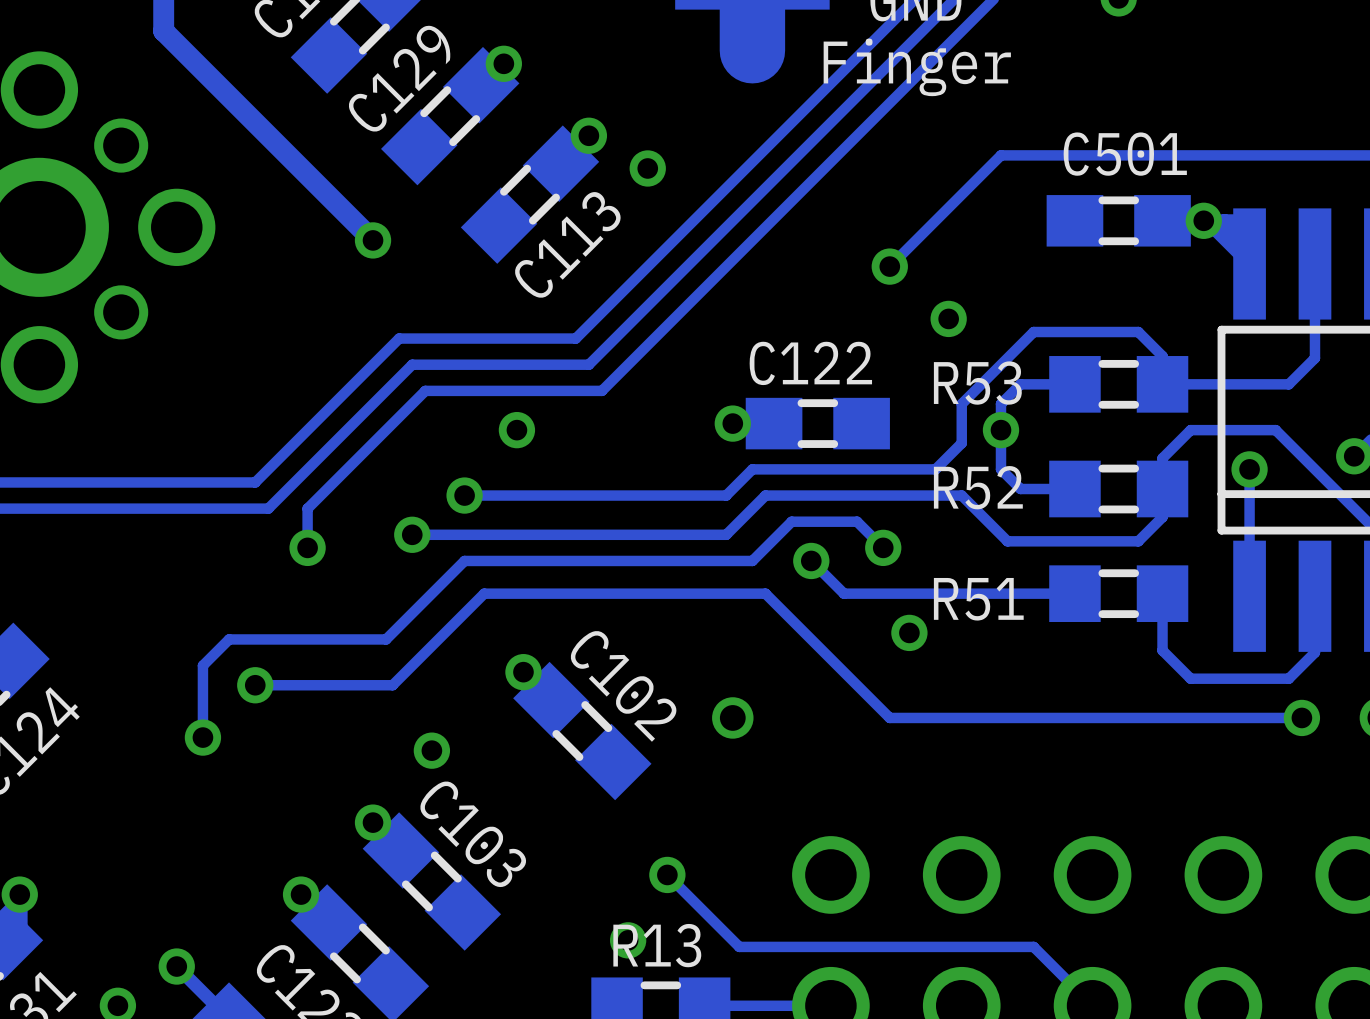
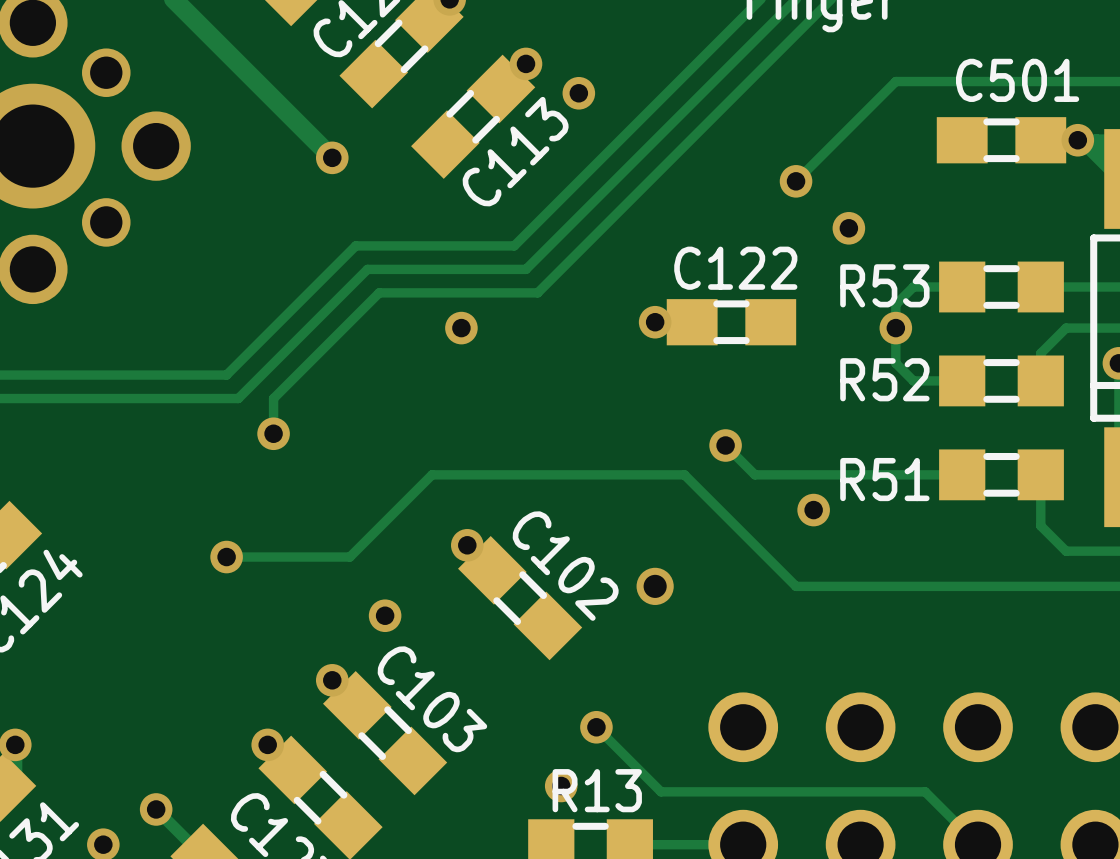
track: (1162, 384) (1162, 356) (1138, 332) (1033, 332) (961, 403) (961, 443) (935, 469) (752, 469) (726, 495) (464, 495) -> none
track: (1162, 489) (1162, 517) (1138, 541) (1007, 541) (961, 495) (765, 495) (726, 534) (412, 534) -> none
via: (464, 495) -> none
via: (412, 534) -> none
track: (883, 547) (857, 521) (791, 521) (752, 560) (464, 560) (386, 639) (229, 639) (202, 665) (202, 737) -> none
via: (883, 547) -> none
via: (202, 737) -> none

